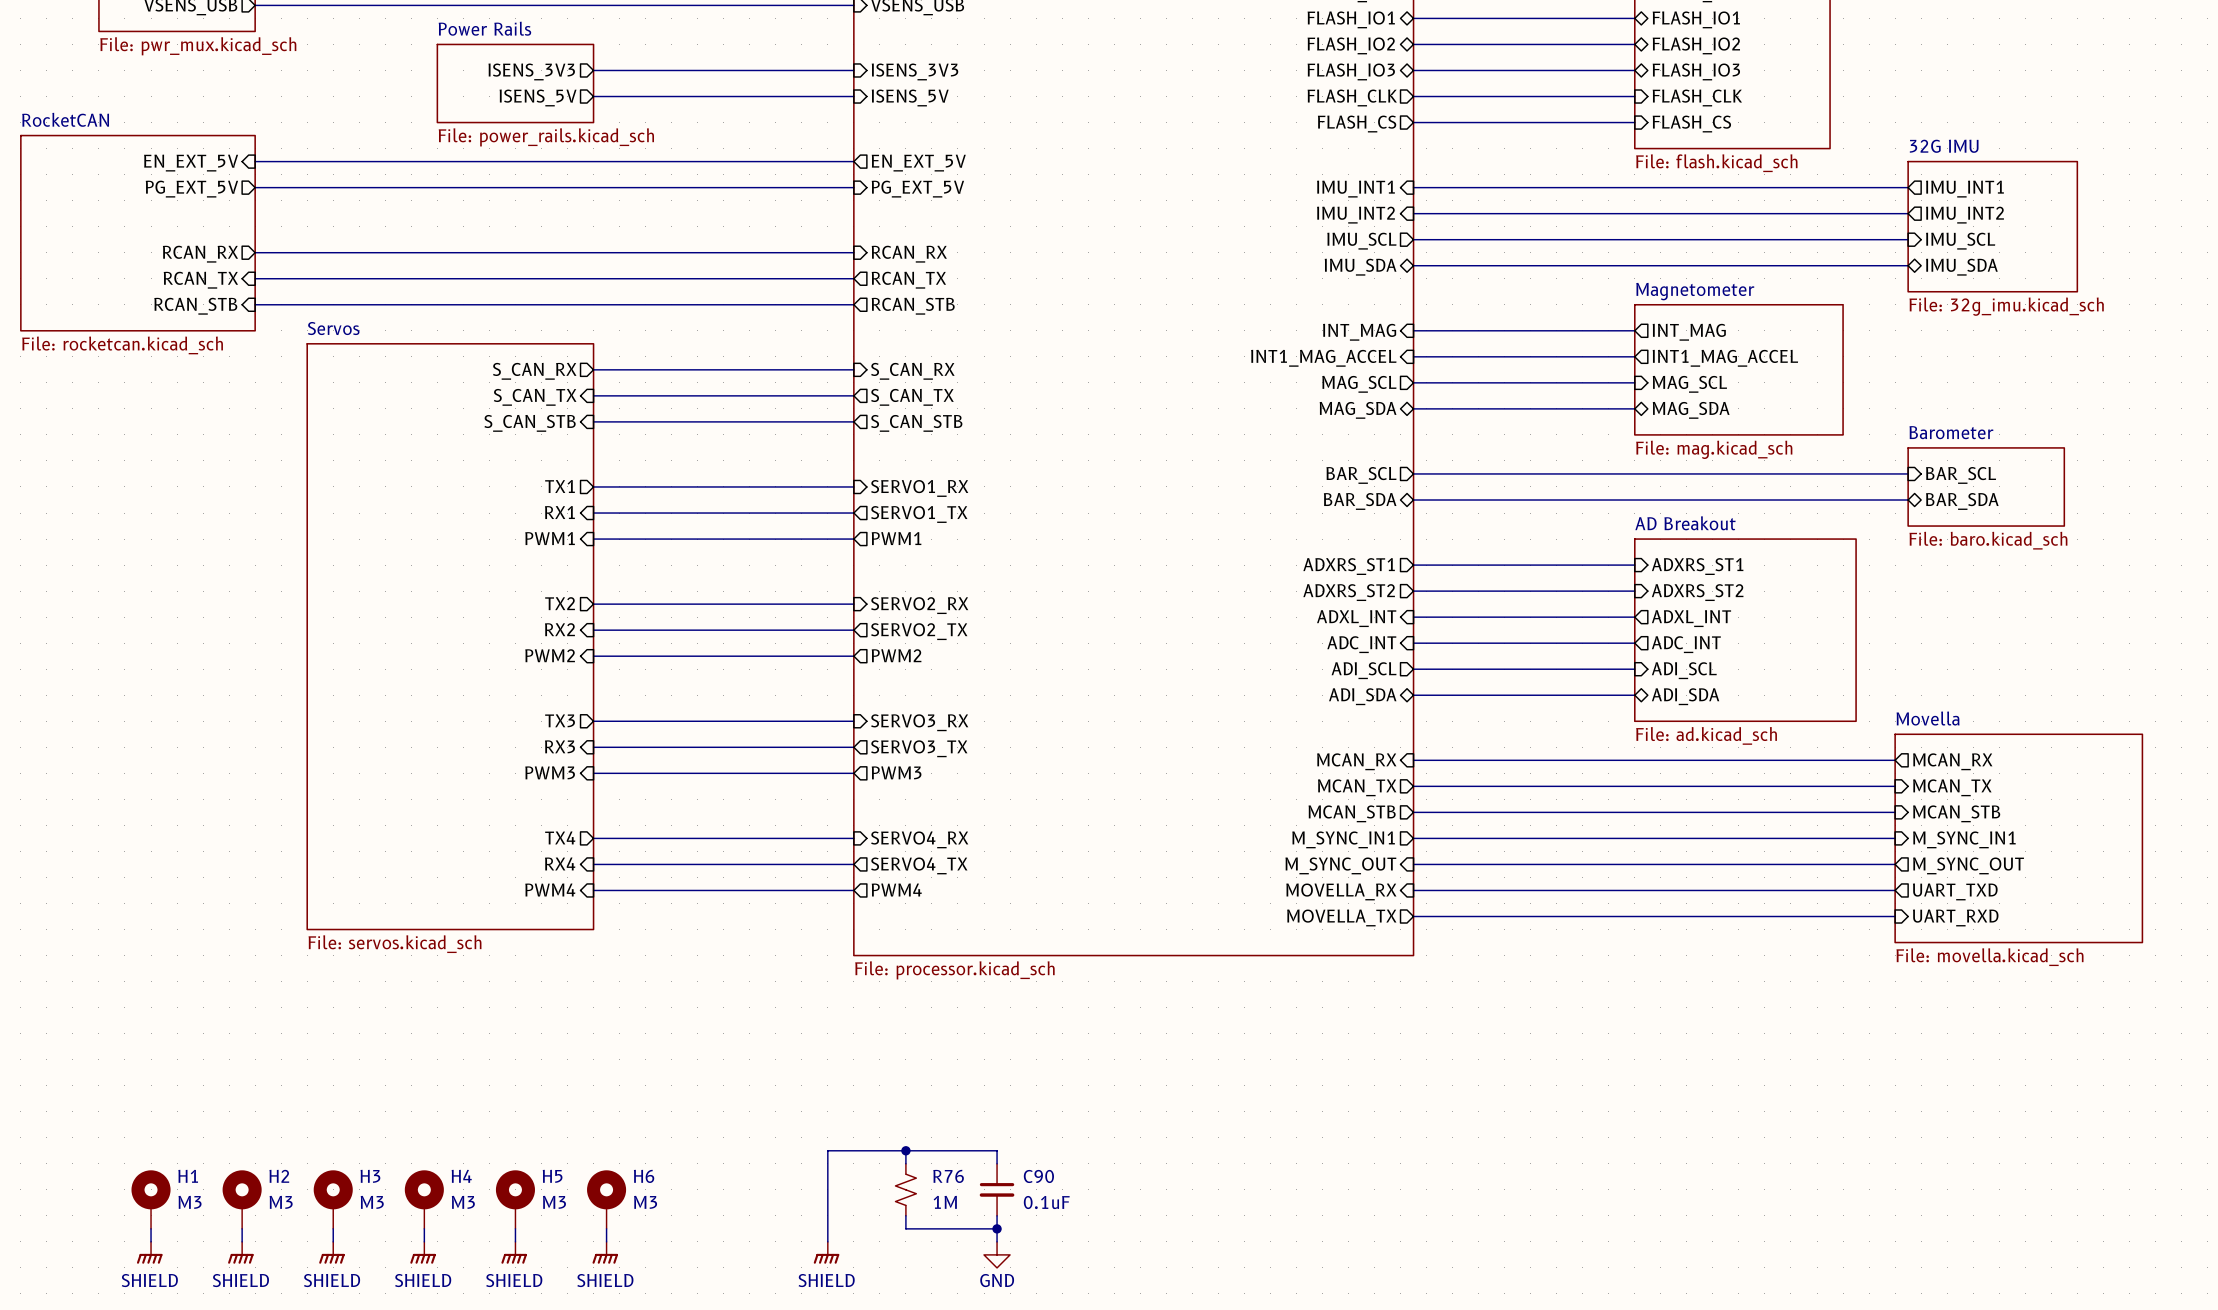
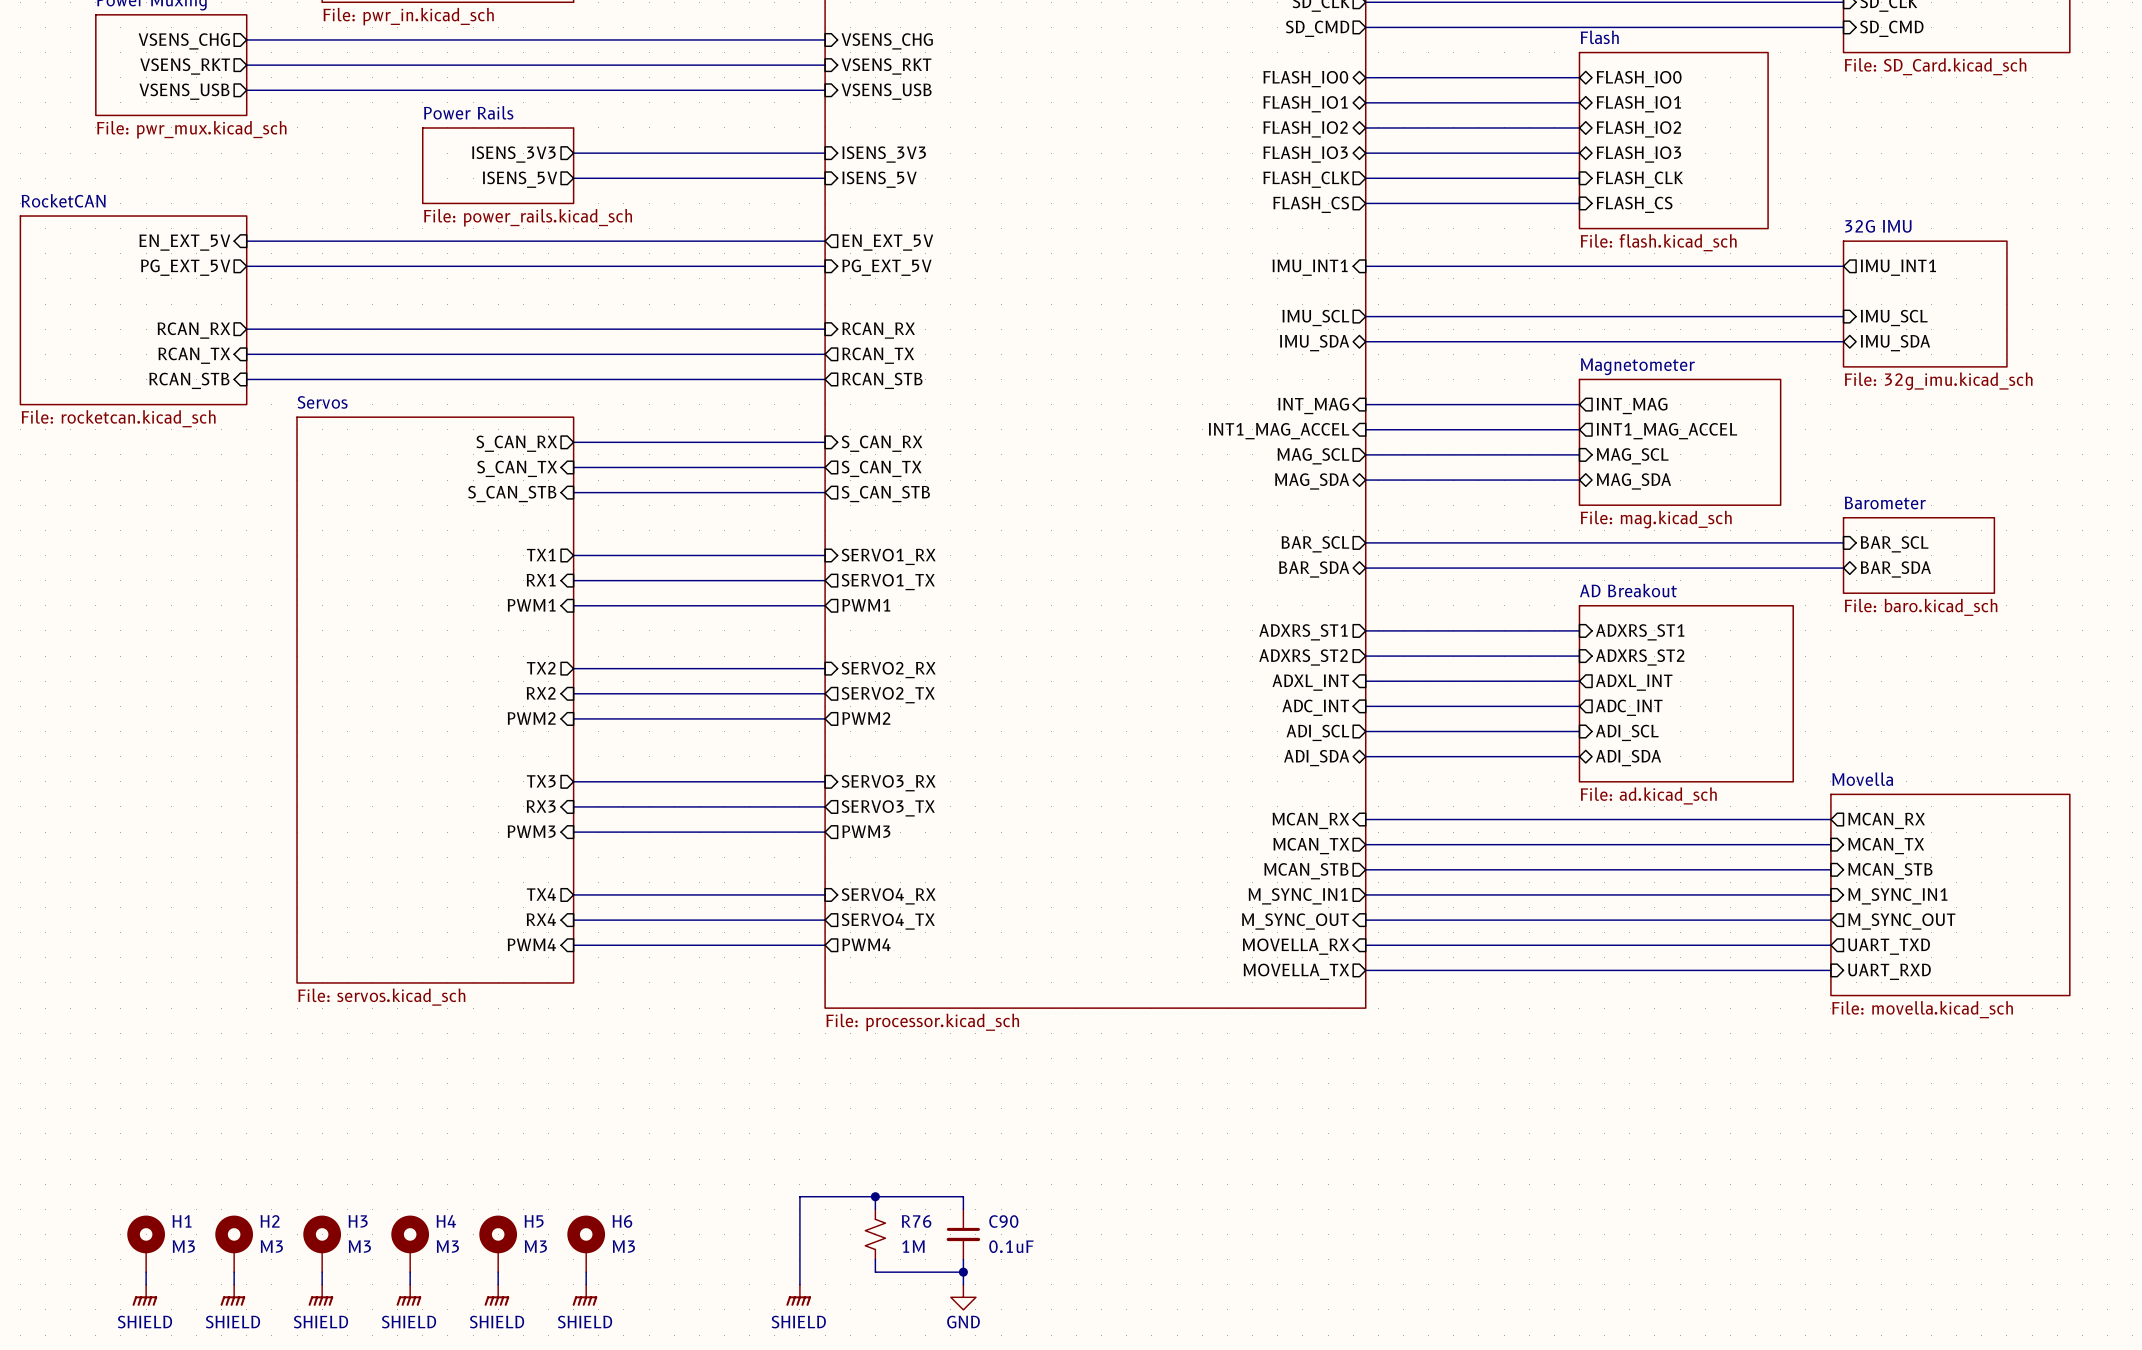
wire: (1413, 213) (1908, 213) -> none
sheet pin: IMU_INT2 (1355, 215) -> none
sheet pin: IMU_INT2 (1964, 215) -> none

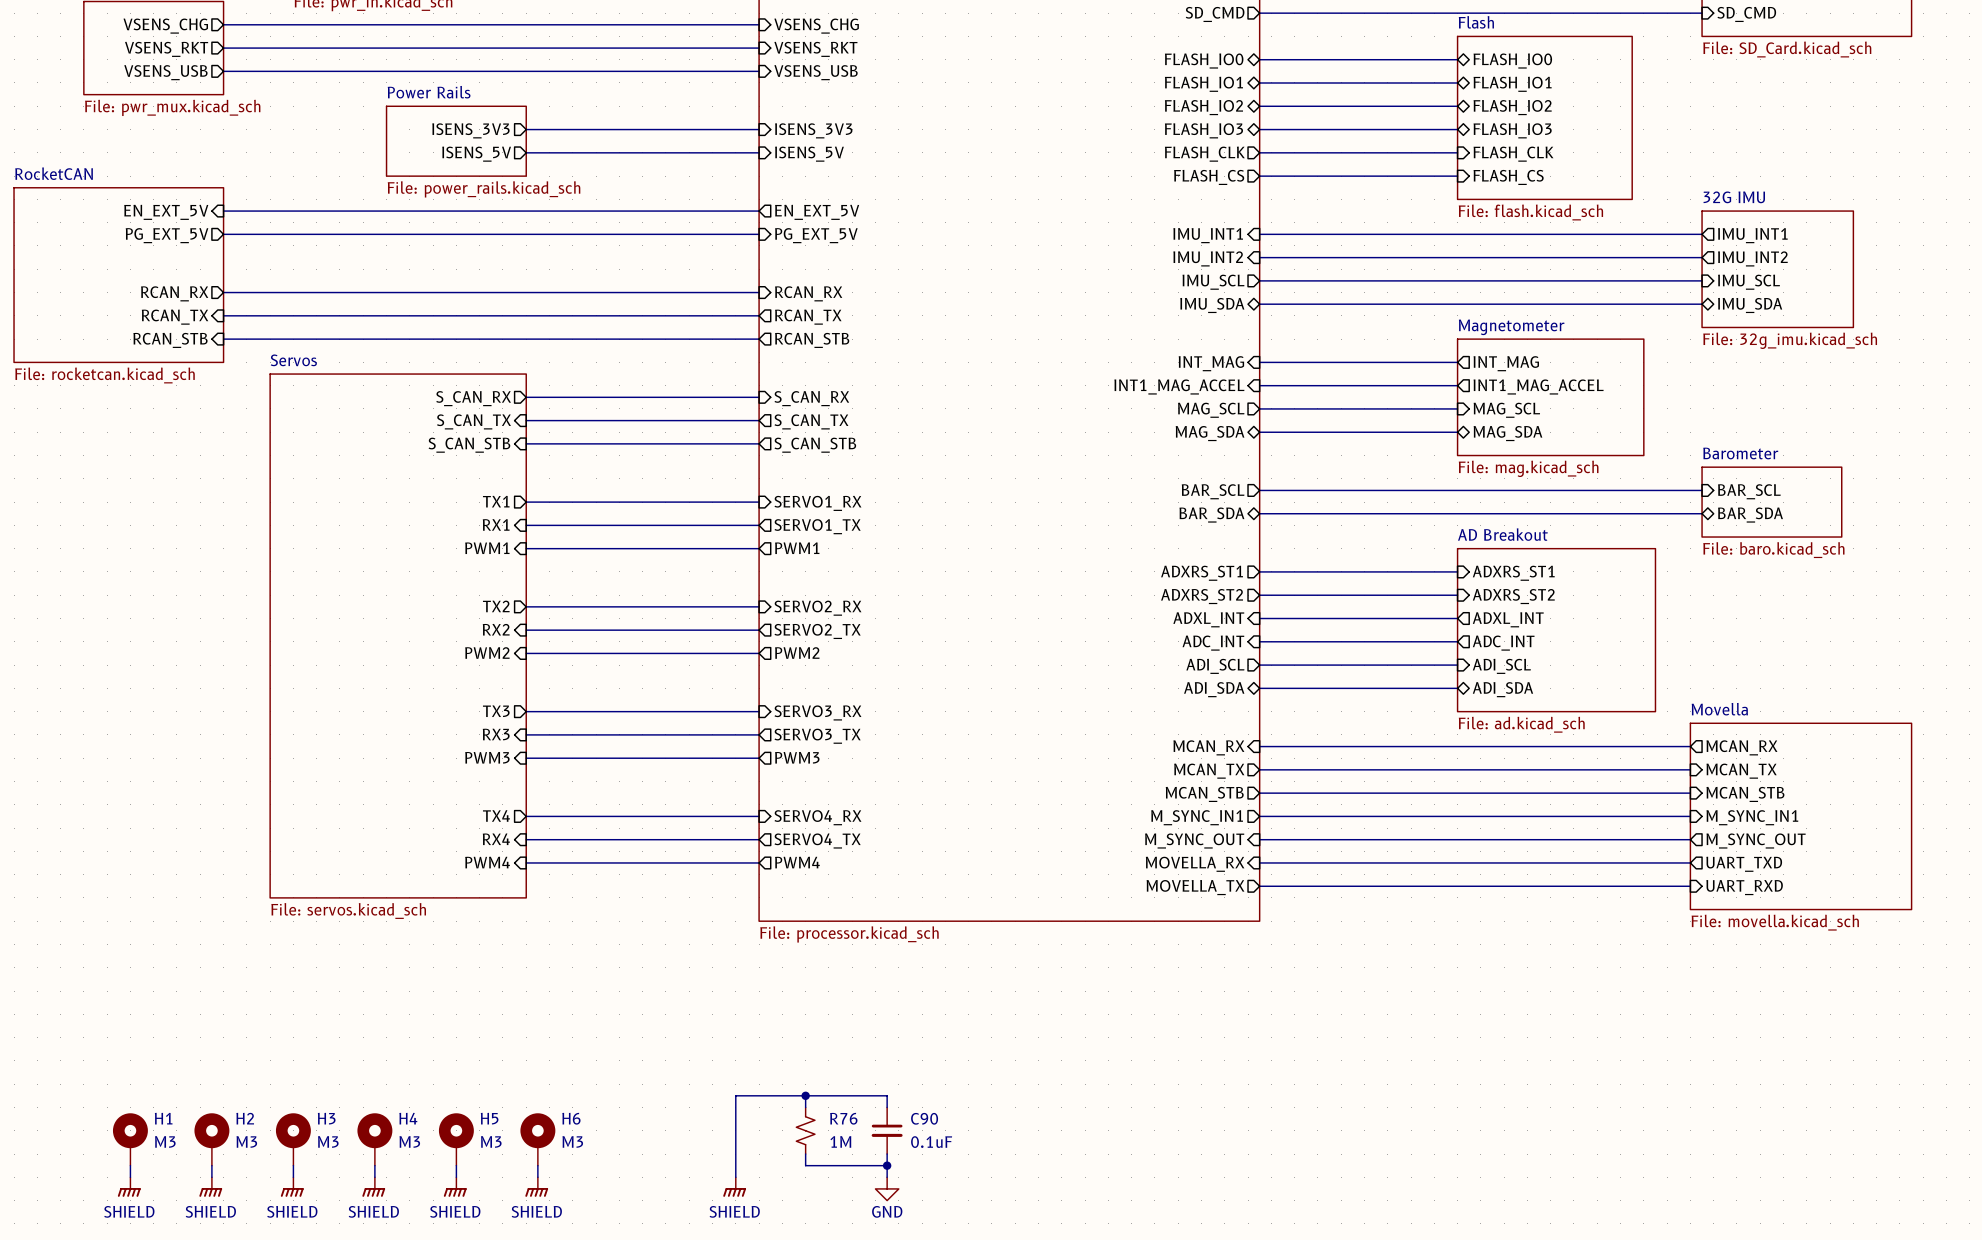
wire: none -> (1259, 257) (1702, 257)
sheet pin: none -> IMU_INT2 (1208, 258)
sheet pin: none -> IMU_INT2 (1752, 258)

